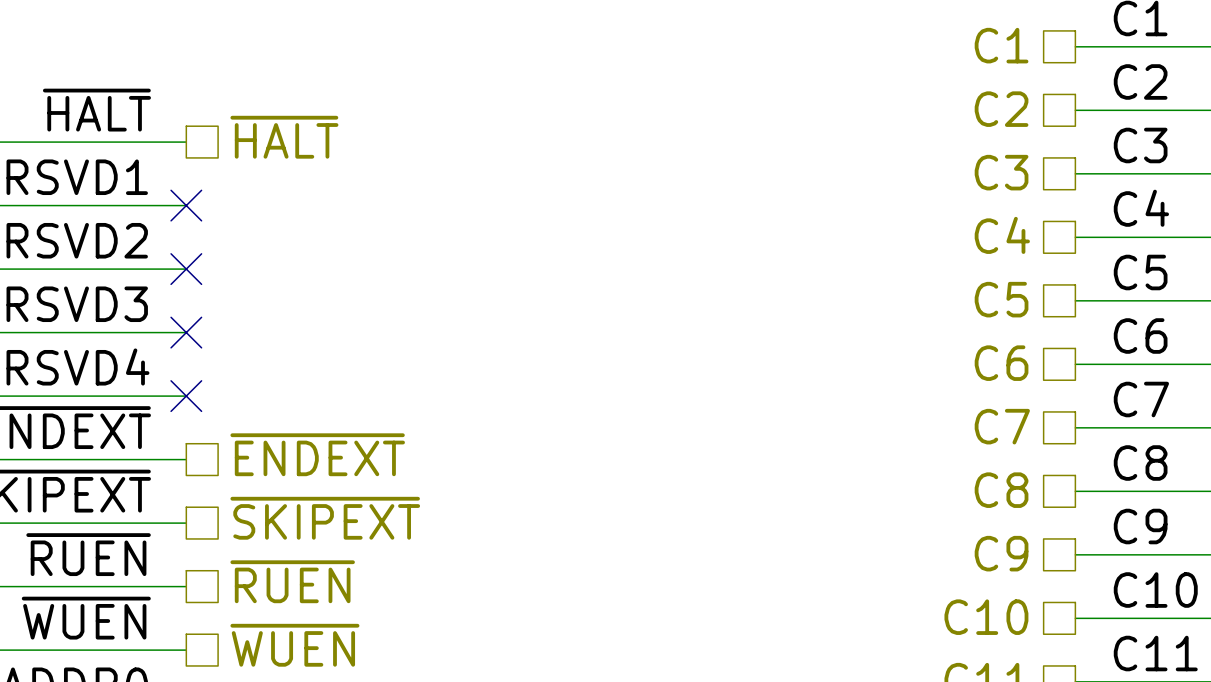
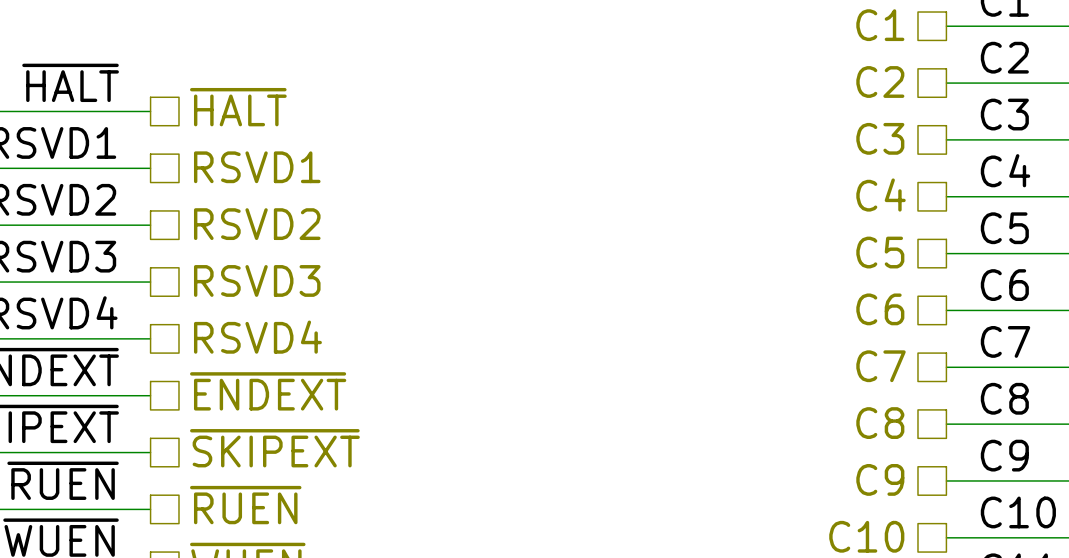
hierarchical label: none -> RSVD1 (257, 167)
no-connect mark: (186, 205) -> none
hierarchical label: none -> RSVD2 (257, 224)
no-connect mark: (186, 269) -> none
hierarchical label: none -> RSVD3 (257, 280)
no-connect mark: (186, 332) -> none
hierarchical label: none -> RSVD4 (257, 337)
no-connect mark: (186, 396) -> none

